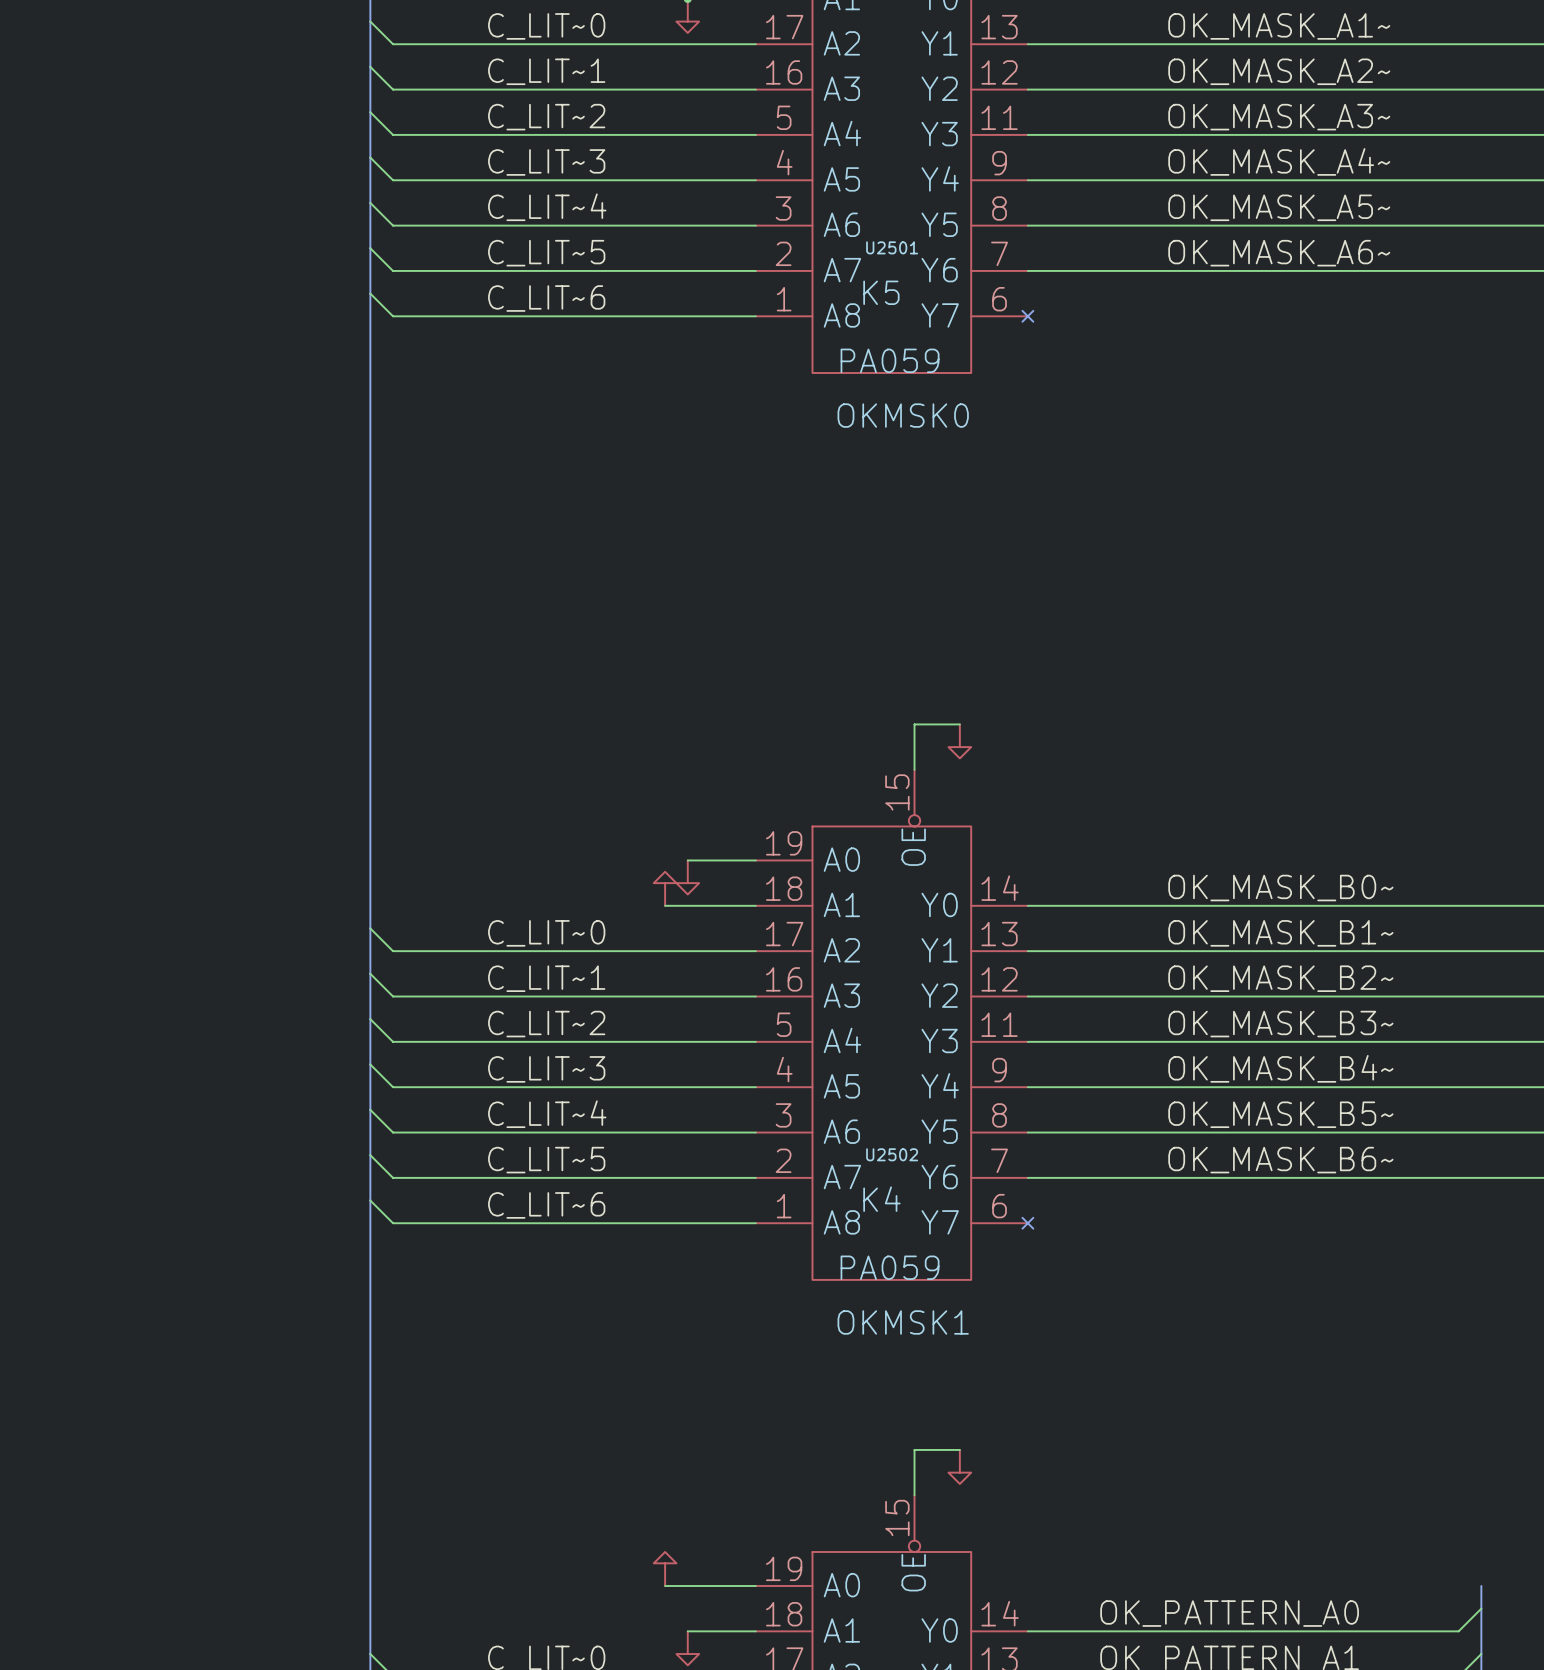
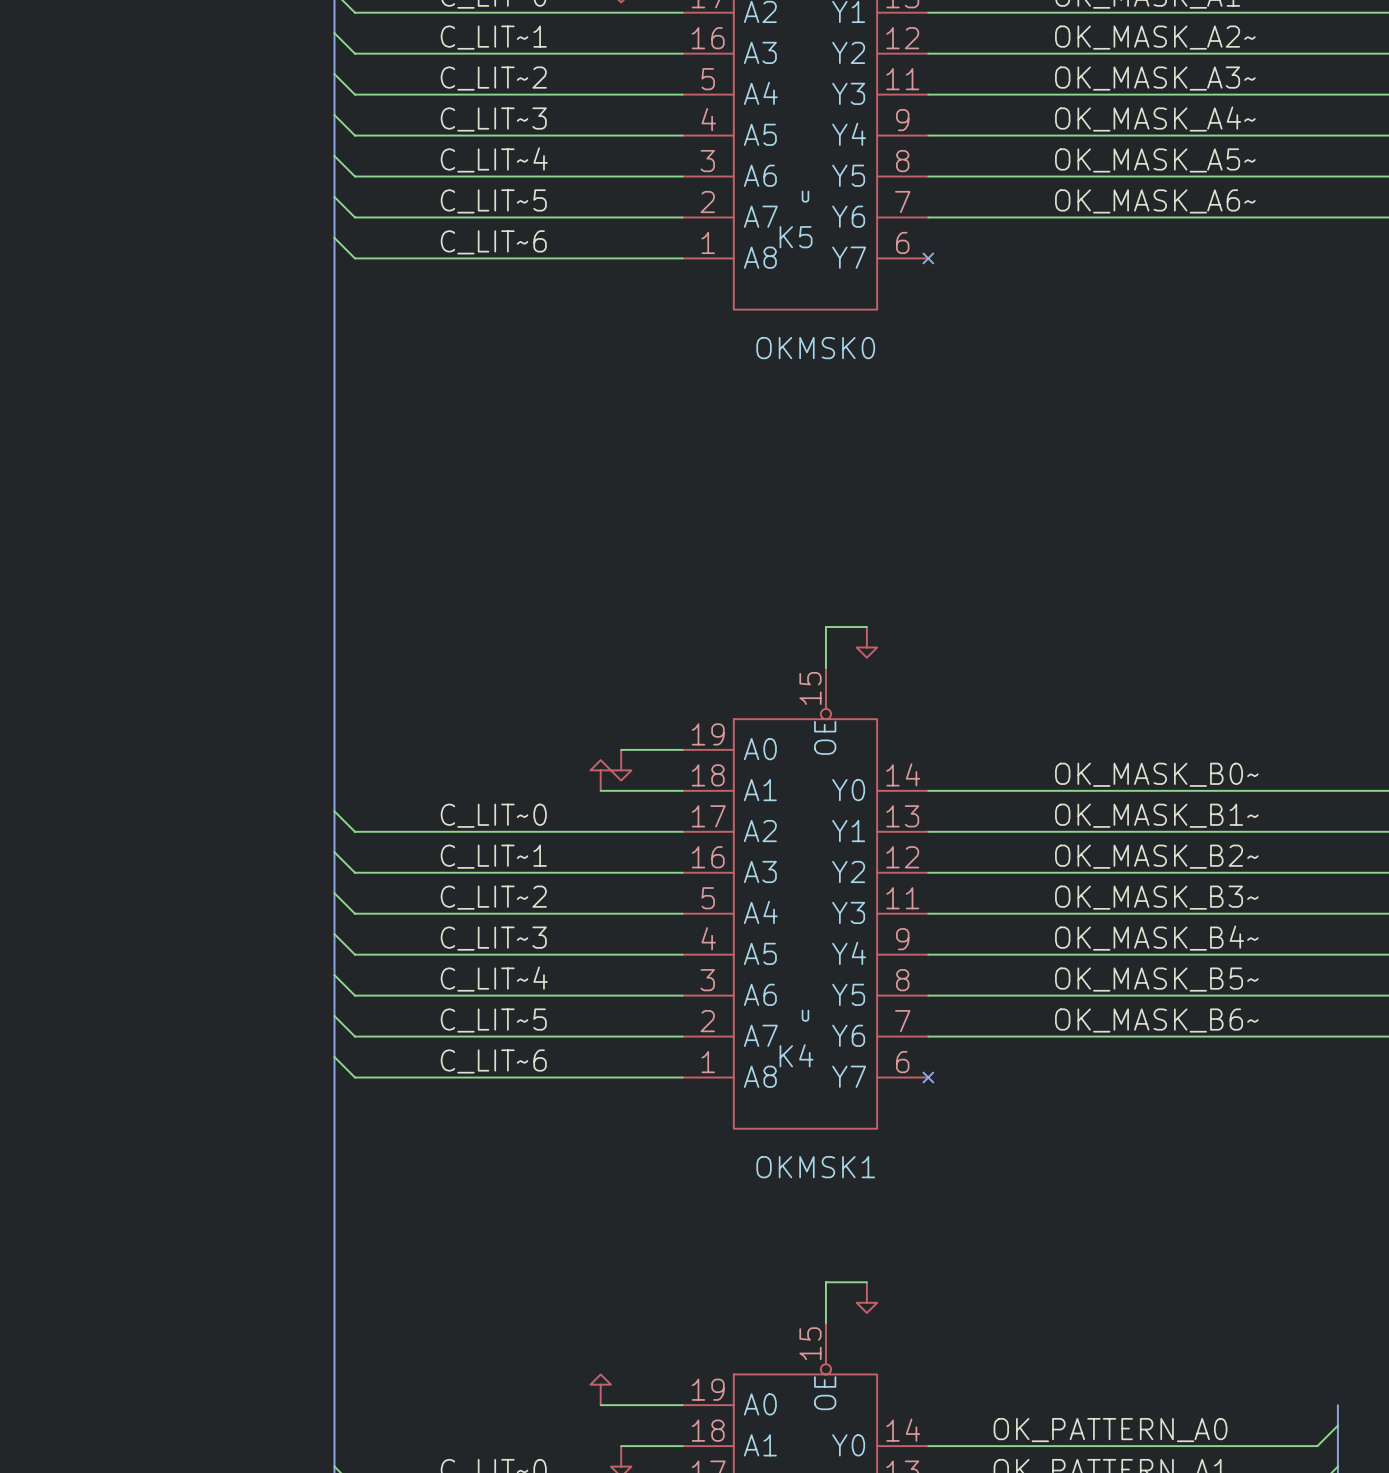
U2501 name: U2501 (892, 247) -> U (805, 196)
U2501 value: PA059 (890, 360) -> none
U2502 name: U2502 (892, 1154) -> U (805, 1015)
U2502 value: PA059 (890, 1267) -> none

